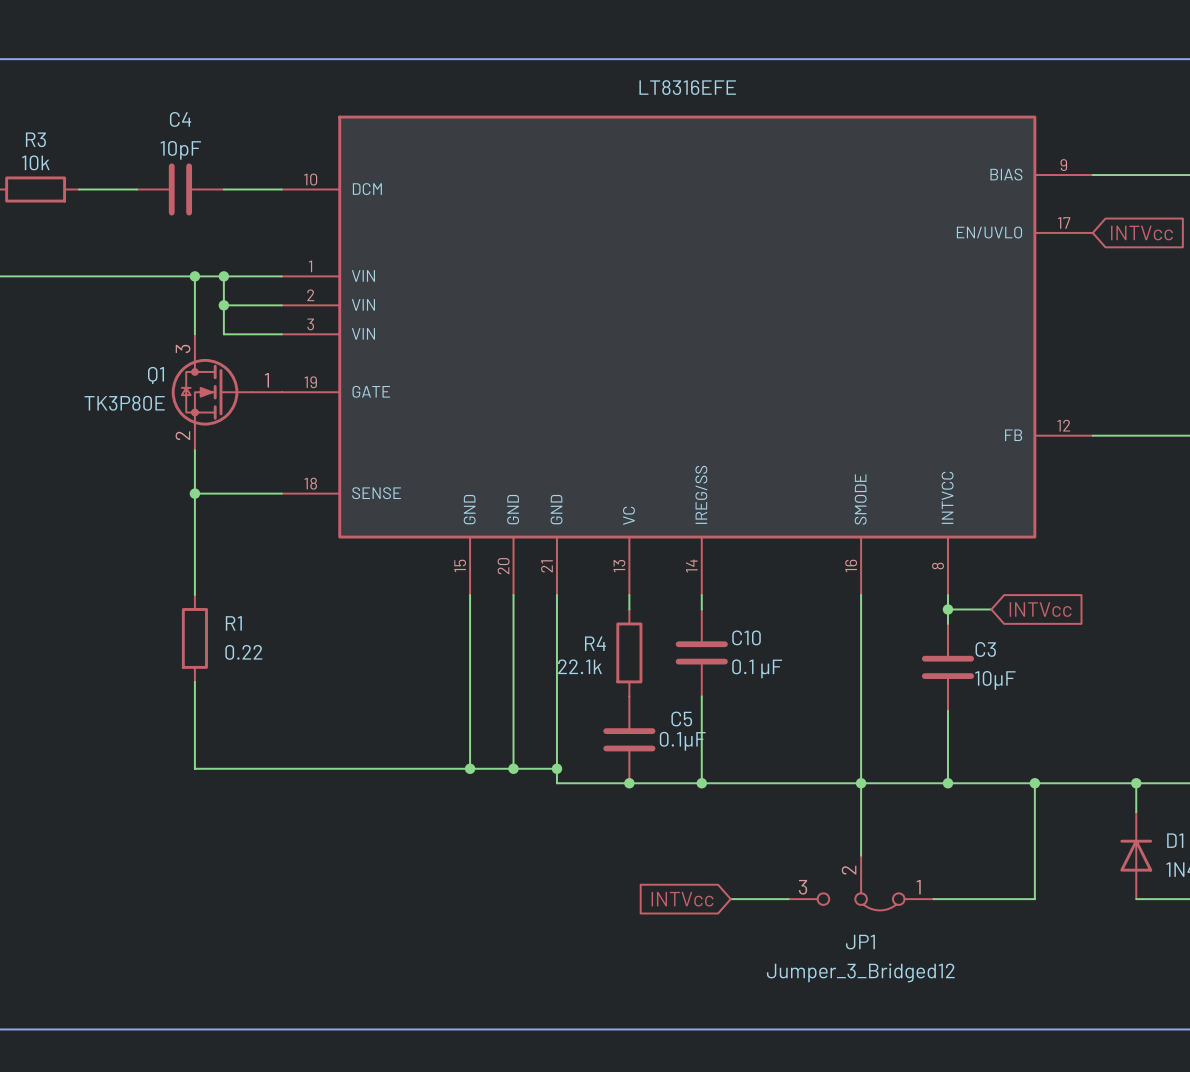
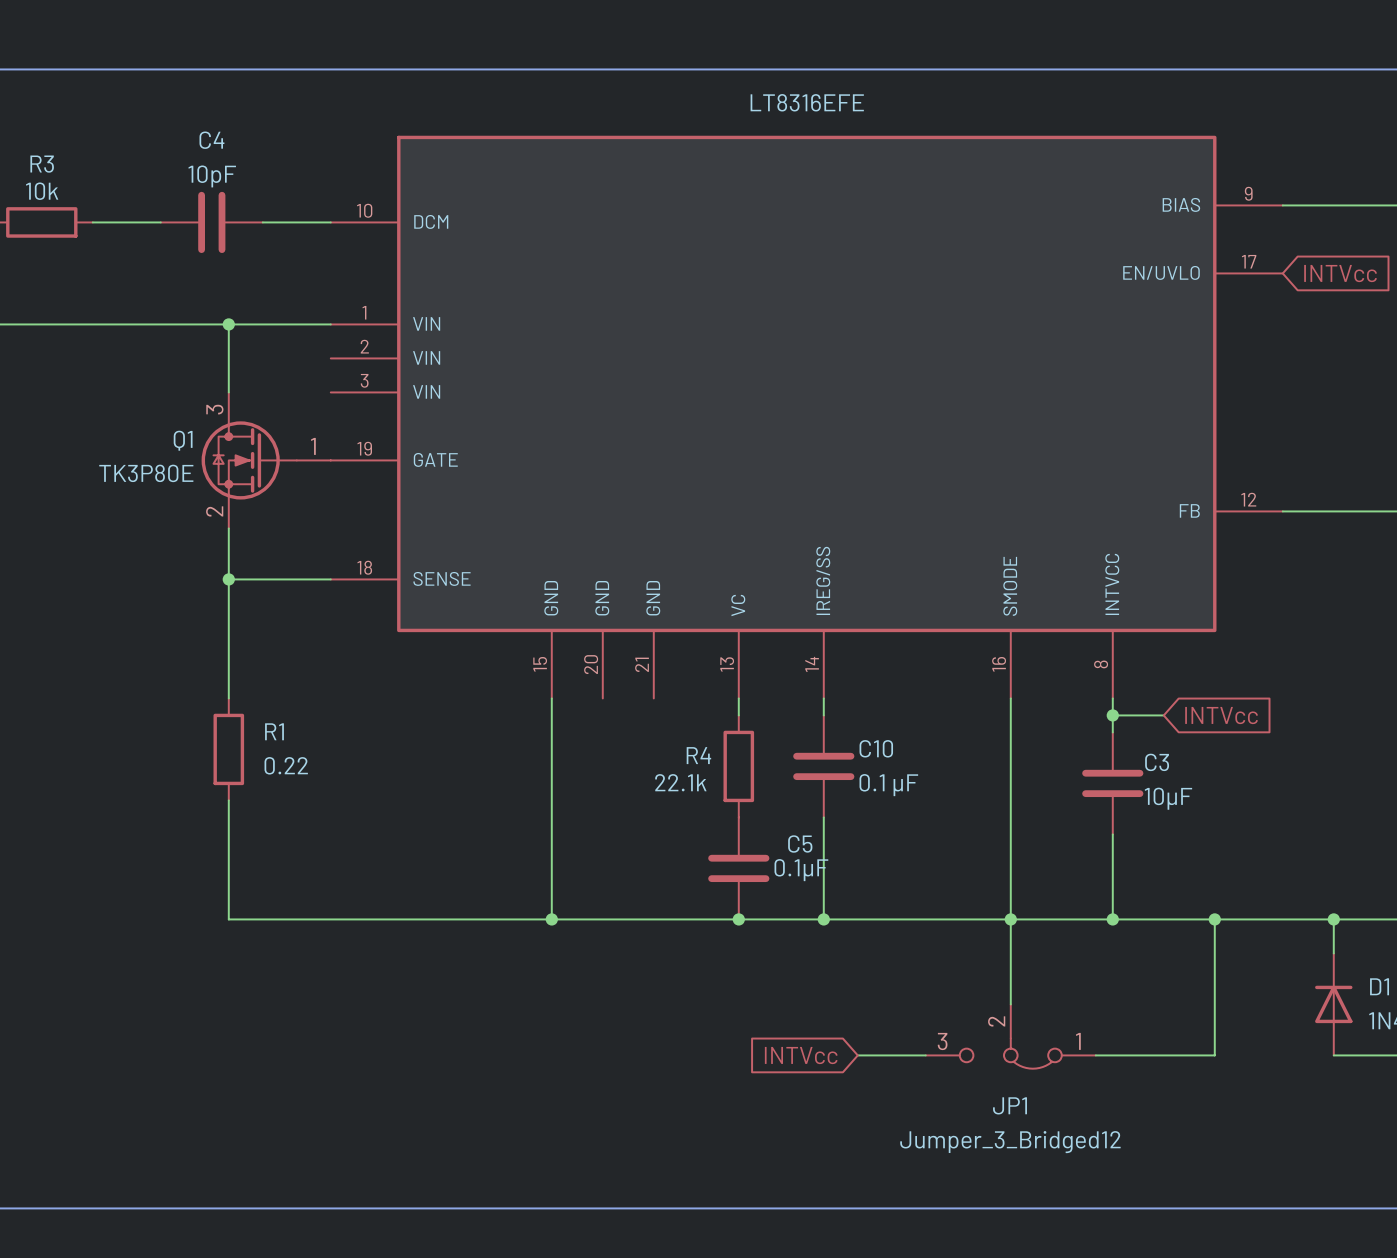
wire: (223, 276) (223, 334) (281, 334) -> none
junction: (223, 276) -> none
wire: (223, 305) (281, 305) -> none
junction: (223, 305) -> none
wire: (513, 594) (513, 768) -> none
wire: (556, 594) (556, 783) -> none
wire: (194, 768) (556, 768) -> (228, 902) (228, 919) (653, 919)
wire: none -> (551, 902) (551, 919)
junction position: (470, 768) -> (551, 919)
junction: (513, 768) -> none
junction: (556, 768) -> none

